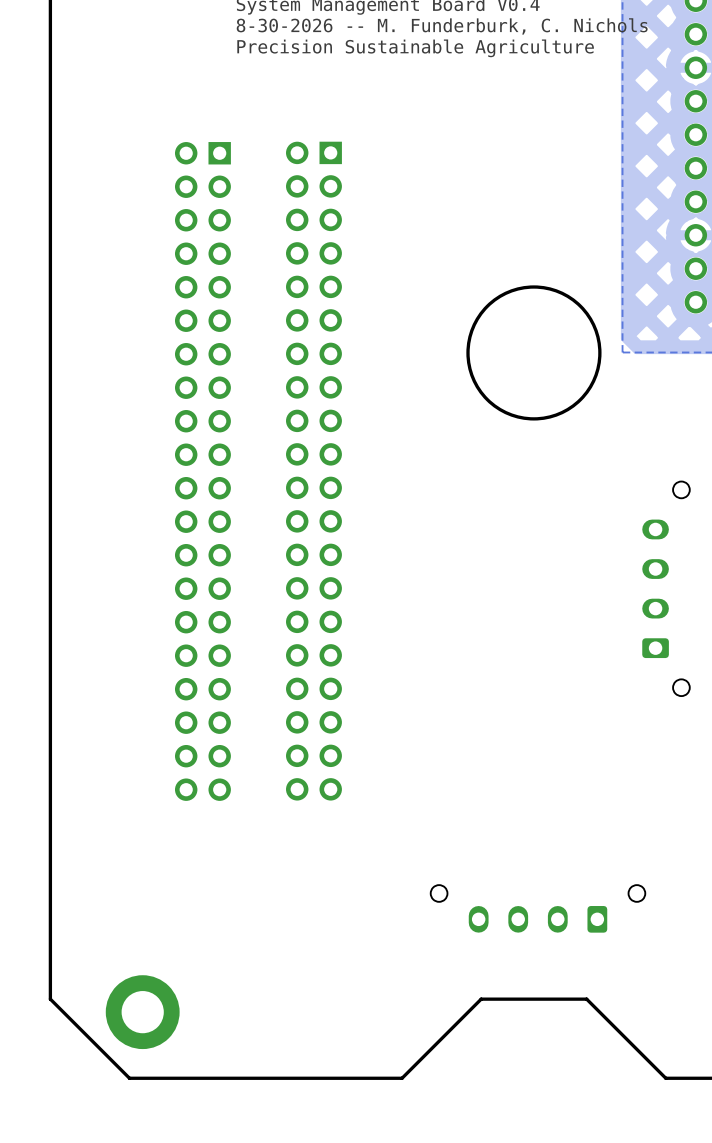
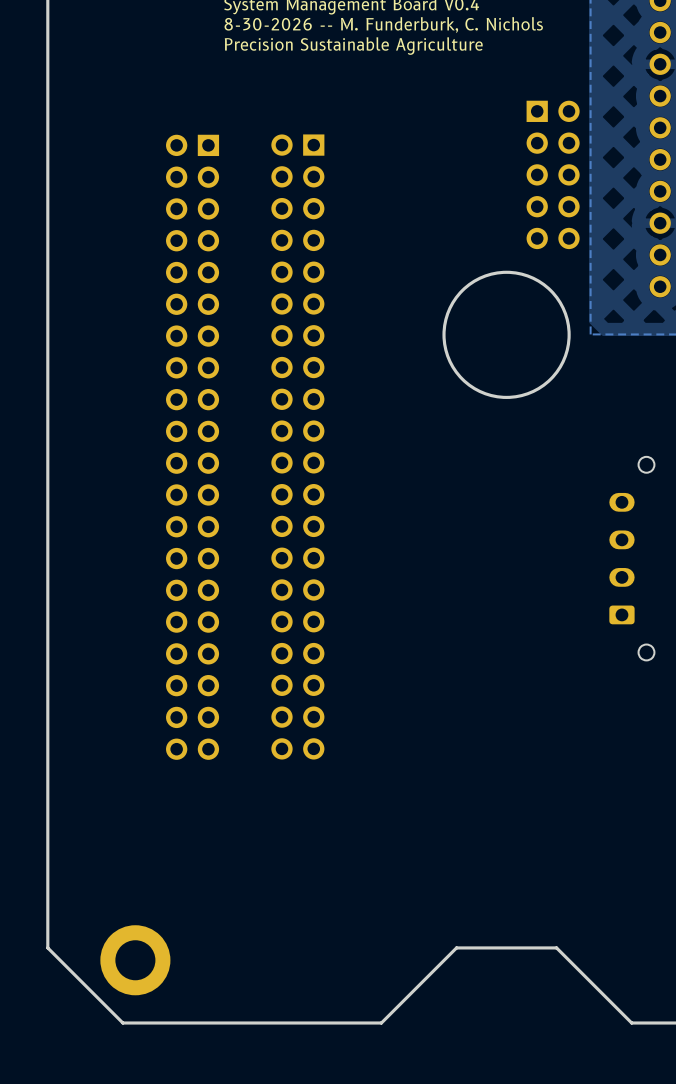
part: none -> (553, 174)
part: (538, 908) -> none

